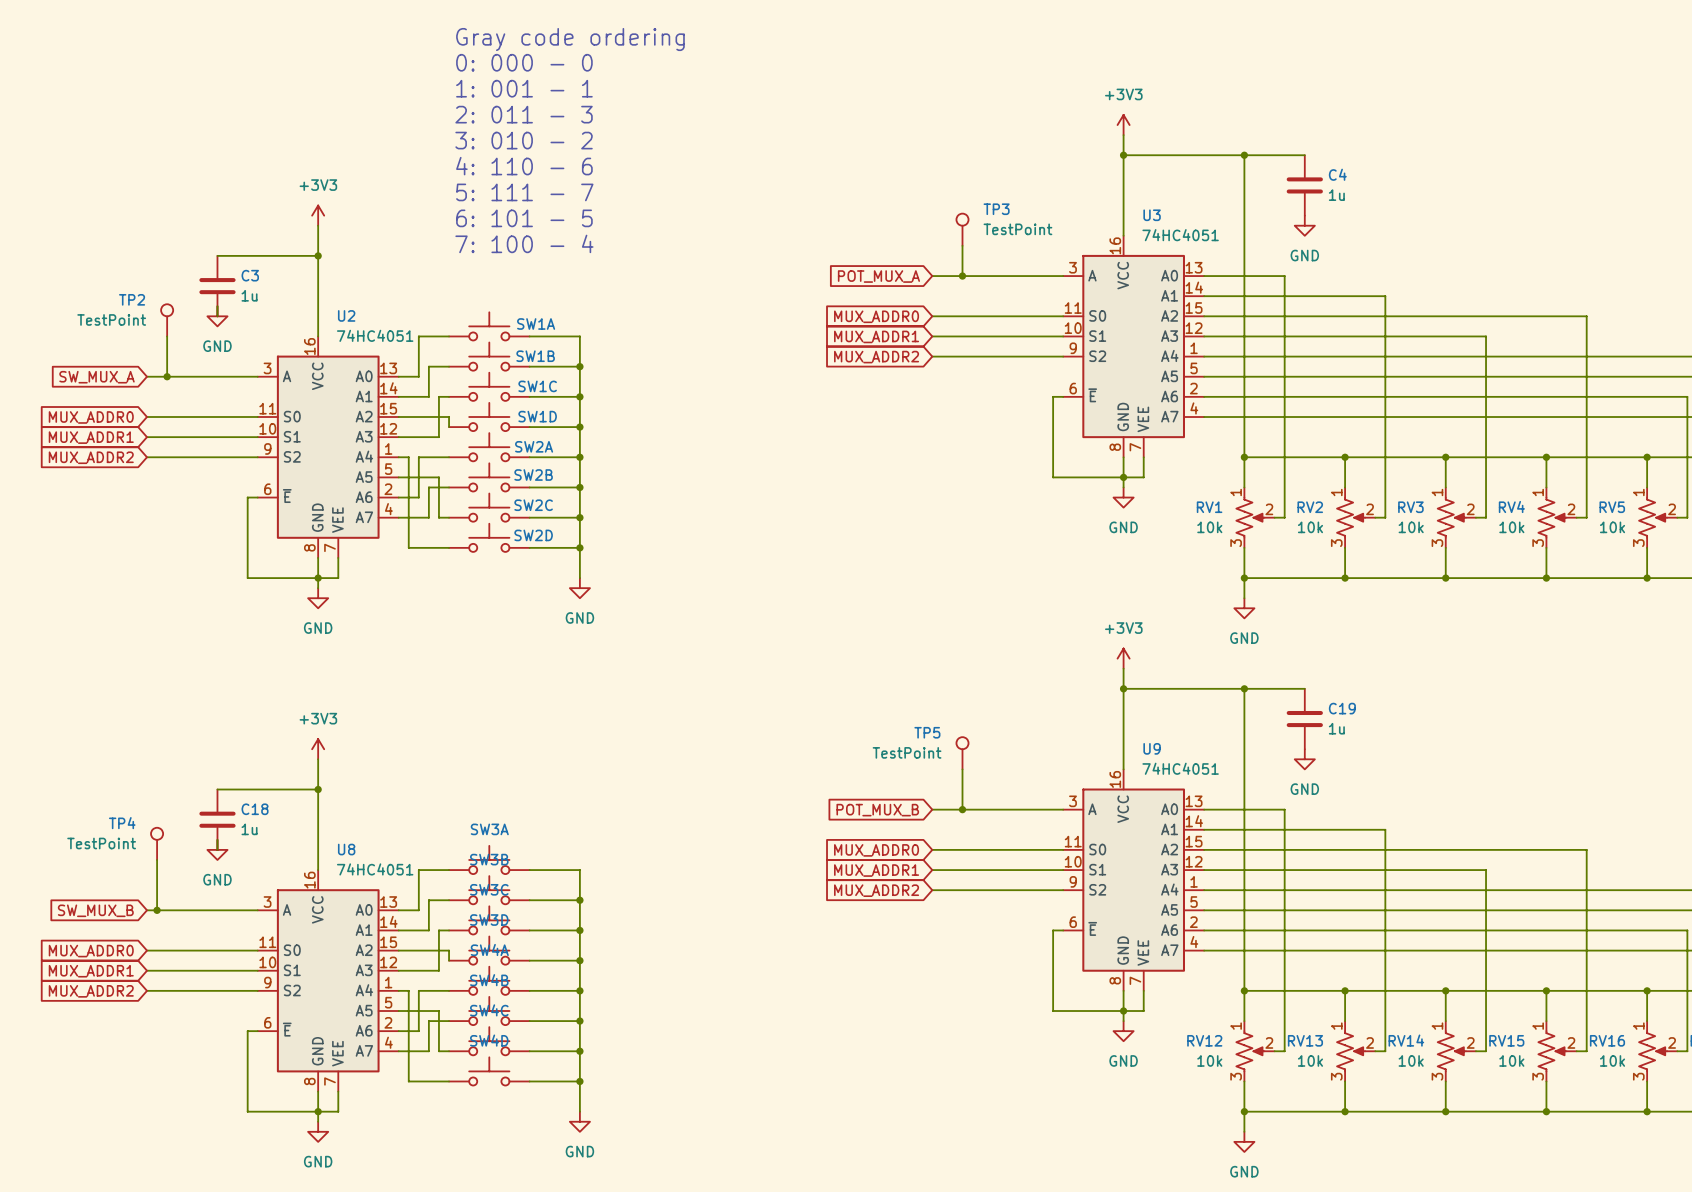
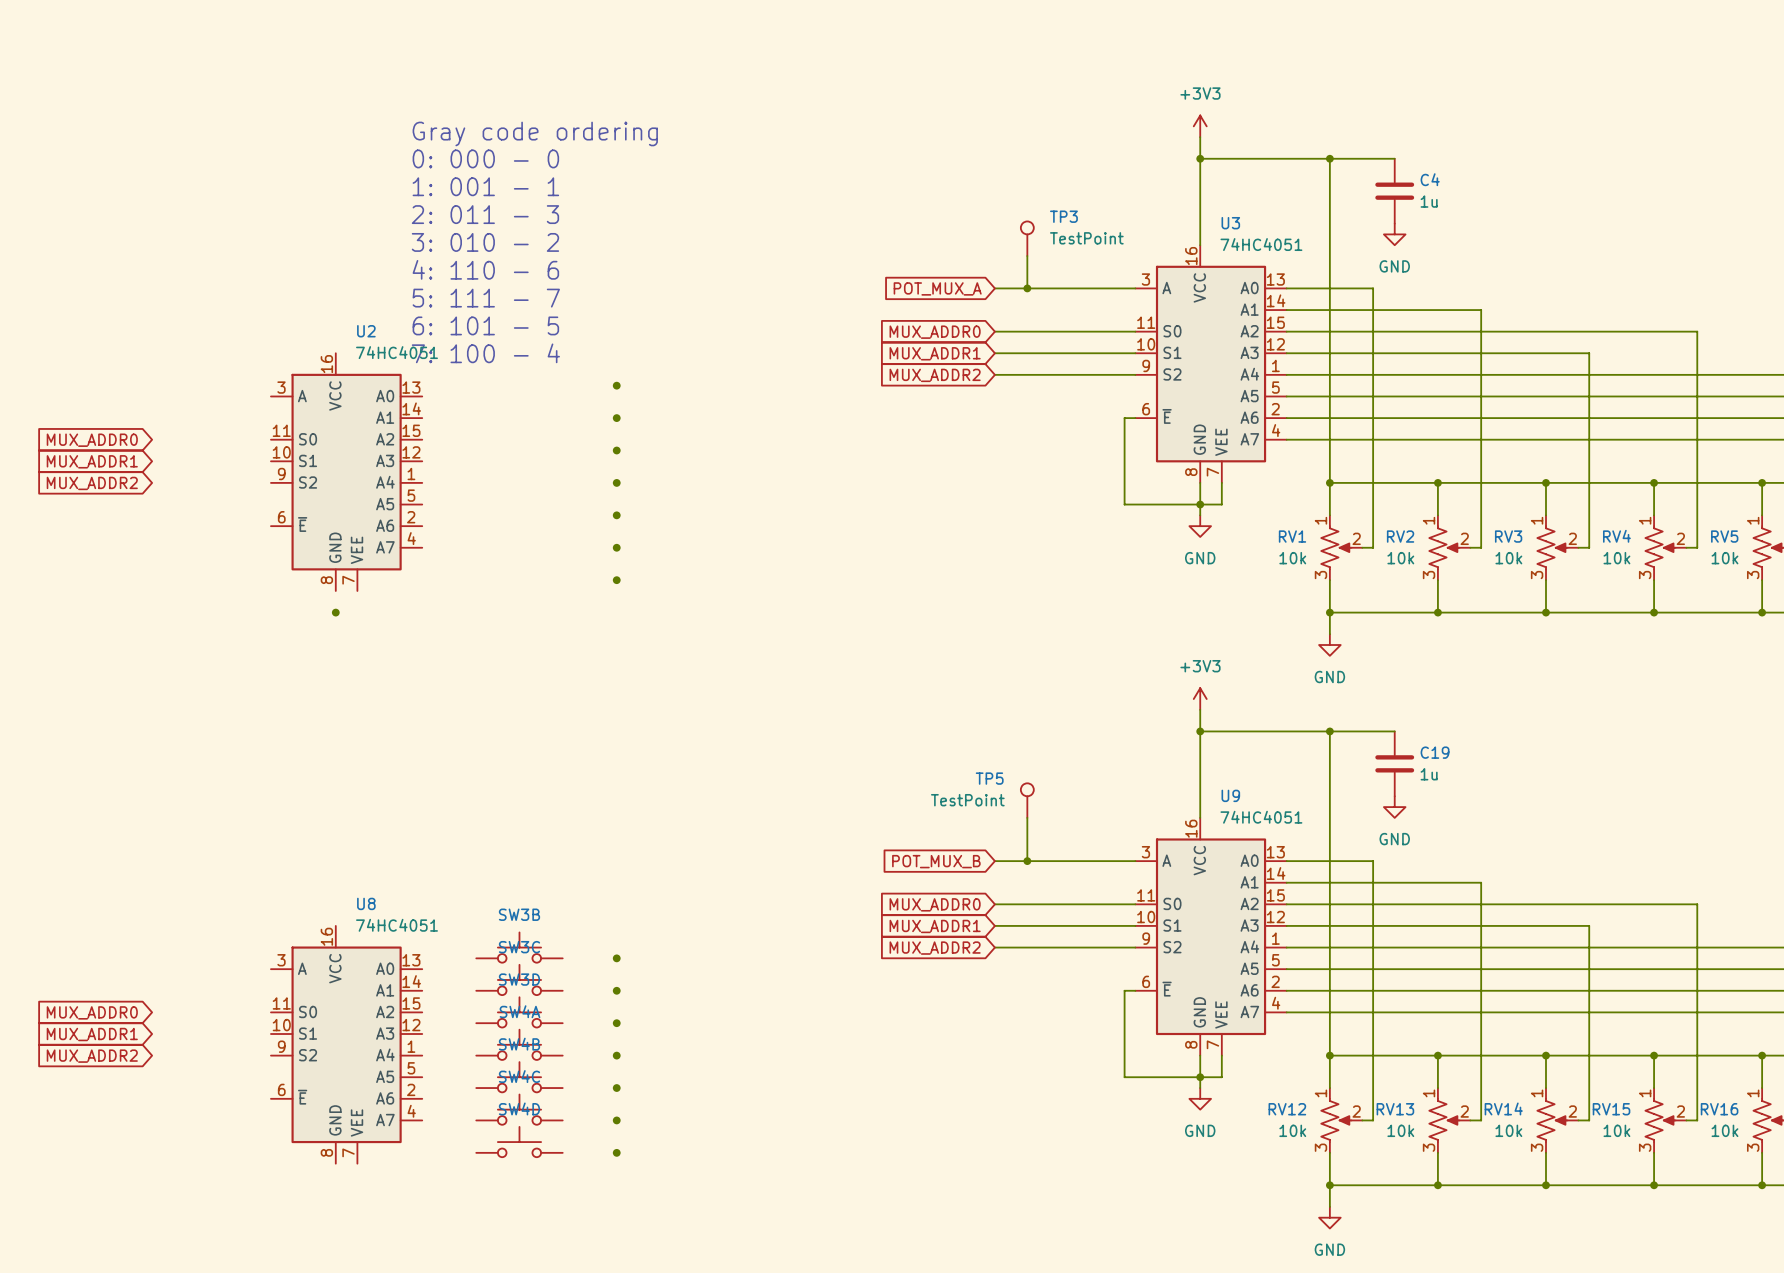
text position: Gray code ordering (570, 39) -> Gray code ordering (535, 133)
text position: 0: 000 - 0 (524, 62) -> 0: 000 - 0 (485, 158)
text position: 1: 001 - 1 (524, 88) -> 1: 001 - 1 (485, 186)
text position: 2: 011 - 3 (524, 114) -> 2: 011 - 3 (485, 214)
text position: 3: 010 - 2 (524, 140) -> 3: 010 - 2 (485, 242)
text position: 4: 110 - 6 (524, 166) -> 4: 110 - 6 (485, 269)
text position: 5: 111 - 7 (524, 192) -> 5: 111 - 7 (486, 298)
power symbol: +3V3 (318, 215) -> none
text position: 6: 101 - 5 (524, 218) -> 6: 101 - 5 (485, 325)
wire: (318, 225) (318, 336) -> none
text position: 7: 100 - 4 (524, 243) -> 7: 100 - 4 (485, 353)
wire: (217, 255) (318, 255) -> none
junction: (318, 255) -> none
C3: 1u (217, 286) -> none
wire: (217, 306) (217, 316) -> none
power symbol: GND (217, 316) -> none
TP2: TestPoint (167, 320) -> none
SW1A: (489, 326) -> none
wire: (167, 336) (167, 376) -> none
wire: (449, 336) (418, 336) (418, 376) (398, 376) -> none
wire: (529, 336) (579, 336) (579, 578) -> none
SW1B: (489, 356) -> none
wire: (449, 366) (428, 366) (428, 396) (398, 396) -> none
wire: (529, 366) (579, 366) -> none
wire: (147, 376) (257, 376) -> none
junction: (167, 376) -> none
global label: SW_MUX_A (97, 377) -> none
SW1C: (489, 386) -> none
wire: (449, 396) (438, 396) (438, 437) (398, 437) -> none
wire: (529, 396) (579, 396) -> none
wire: (147, 417) (257, 417) -> none
wire: (398, 417) (449, 417) (449, 427) -> none
SW1D: (489, 417) -> none
wire: (529, 427) (579, 427) -> none
wire: (147, 437) (257, 437) -> none
SW2A: (489, 447) -> none
wire: (147, 457) (257, 457) -> none
wire: (398, 457) (408, 457) (408, 547) (449, 547) -> none
wire: (449, 457) (418, 457) (418, 497) (398, 497) -> none
wire: (529, 457) (579, 457) -> none
wire: (398, 477) (438, 477) (438, 517) (449, 517) -> none
SW2B: (489, 477) -> none
wire: (449, 487) (428, 487) (428, 517) (398, 517) -> none
wire: (529, 487) (579, 487) -> none
wire: (257, 497) (247, 497) (247, 578) (338, 578) (338, 557) -> none
SW2C: (489, 507) -> none
wire: (529, 517) (579, 517) -> none
SW2D: (489, 537) -> none
wire: (529, 547) (579, 547) -> none
wire: (318, 557) (318, 588) -> none
power symbol: GND (579, 588) -> none
power symbol: GND (318, 598) -> none
power symbol: +3V3 (318, 749) -> none
wire: (318, 759) (318, 870) -> none
wire: (217, 789) (318, 789) -> none
junction: (318, 789) -> none
C18: 1u (217, 819) -> none
wire: (217, 839) (217, 849) -> none
TP4: TestPoint (157, 843) -> none
power symbol: GND (217, 849) -> none
wire: (157, 859) (157, 910) -> none
SW3A: (489, 859) -> none
wire: (449, 870) (418, 870) (418, 910) (398, 910) -> none
wire: (529, 870) (579, 870) (579, 1111) -> none
wire: (449, 900) (428, 900) (428, 930) (398, 930) -> none
wire: (529, 900) (579, 900) -> none
global label: SW_MUX_B (95, 910) -> none
wire: (147, 910) (257, 910) -> none
junction: (157, 910) -> none
wire: (449, 930) (438, 930) (438, 970) (398, 970) -> none
wire: (529, 930) (579, 930) -> none
wire: (147, 950) (257, 950) -> none
wire: (398, 950) (449, 950) (449, 960) -> none
wire: (529, 960) (579, 960) -> none
wire: (147, 970) (257, 970) -> none
wire: (147, 990) (257, 990) -> none
wire: (398, 990) (408, 990) (408, 1081) (449, 1081) -> none
wire: (449, 990) (418, 990) (418, 1031) (398, 1031) -> none
wire: (529, 990) (579, 990) -> none
wire: (398, 1011) (438, 1011) (438, 1051) (449, 1051) -> none
wire: (449, 1021) (428, 1021) (428, 1051) (398, 1051) -> none
wire: (529, 1021) (579, 1021) -> none
wire: (257, 1031) (247, 1031) (247, 1111) (338, 1111) (338, 1091) -> none
wire: (529, 1051) (579, 1051) -> none
wire: (529, 1081) (579, 1081) -> none
wire: (318, 1091) (318, 1121) -> none
junction: (318, 1111) -> none
power symbol: GND (579, 1121) -> none
power symbol: GND (318, 1131) -> none

